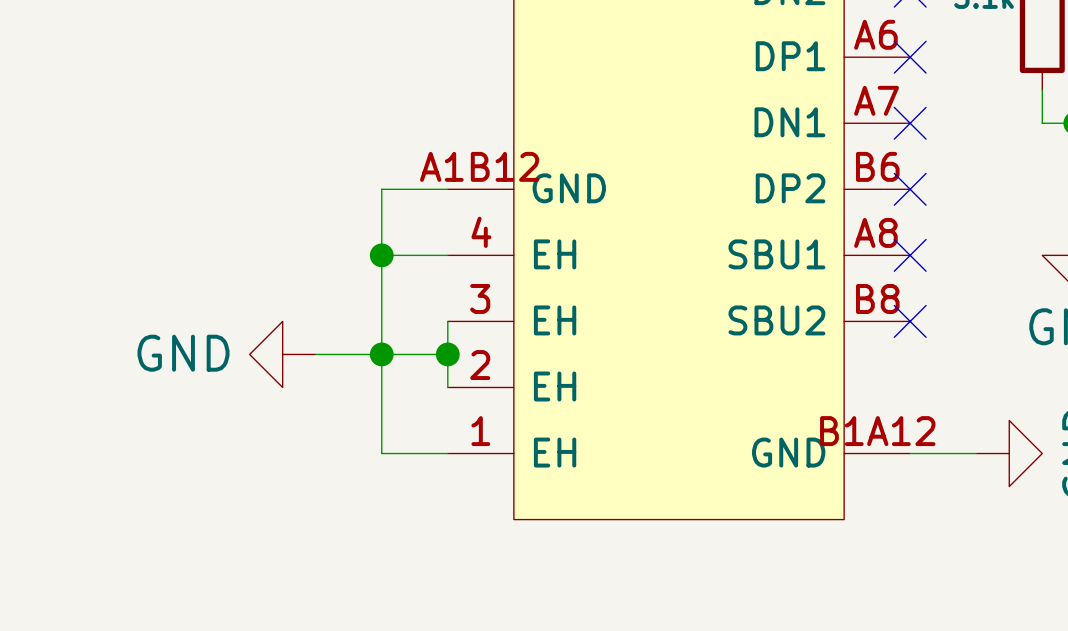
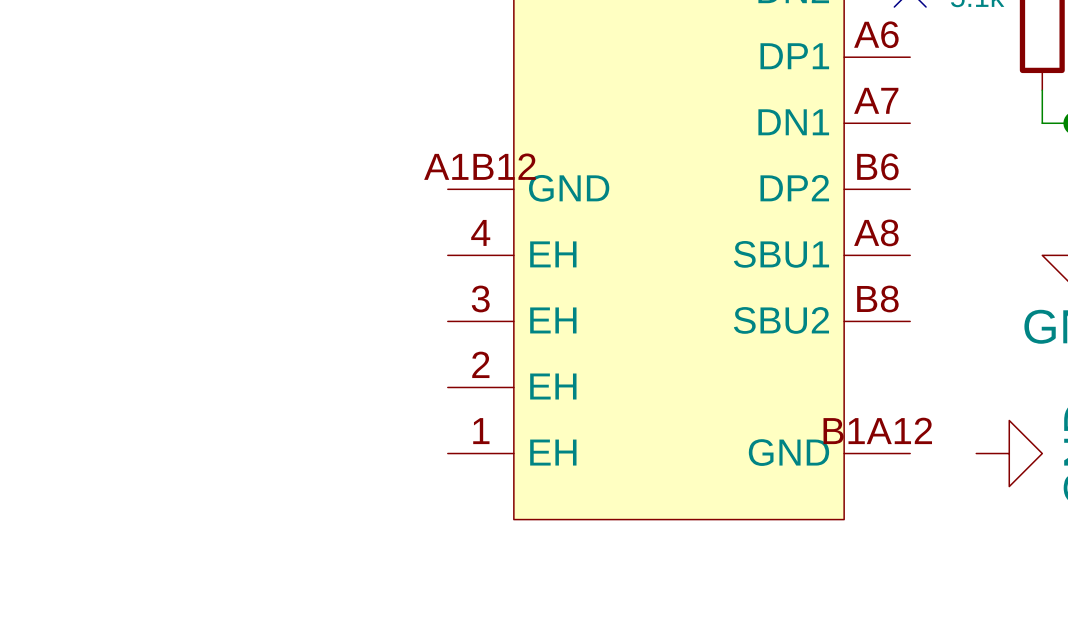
no-connect mark: (910, 57) -> none
no-connect mark: (910, 123) -> none
wire: (447, 189) (381, 189) (381, 453) (447, 453) -> none
no-connect mark: (910, 189) -> none
wire: (381, 255) (447, 255) -> none
junction: (381, 255) -> none
no-connect mark: (910, 255) -> none
wire: (447, 321) (447, 387) -> none
no-connect mark: (910, 321) -> none
power symbol: GND (282, 354) -> none
wire: (315, 354) (447, 354) -> none
junction: (381, 354) -> none
junction: (447, 354) -> none
wire: (910, 453) (976, 453) -> none

